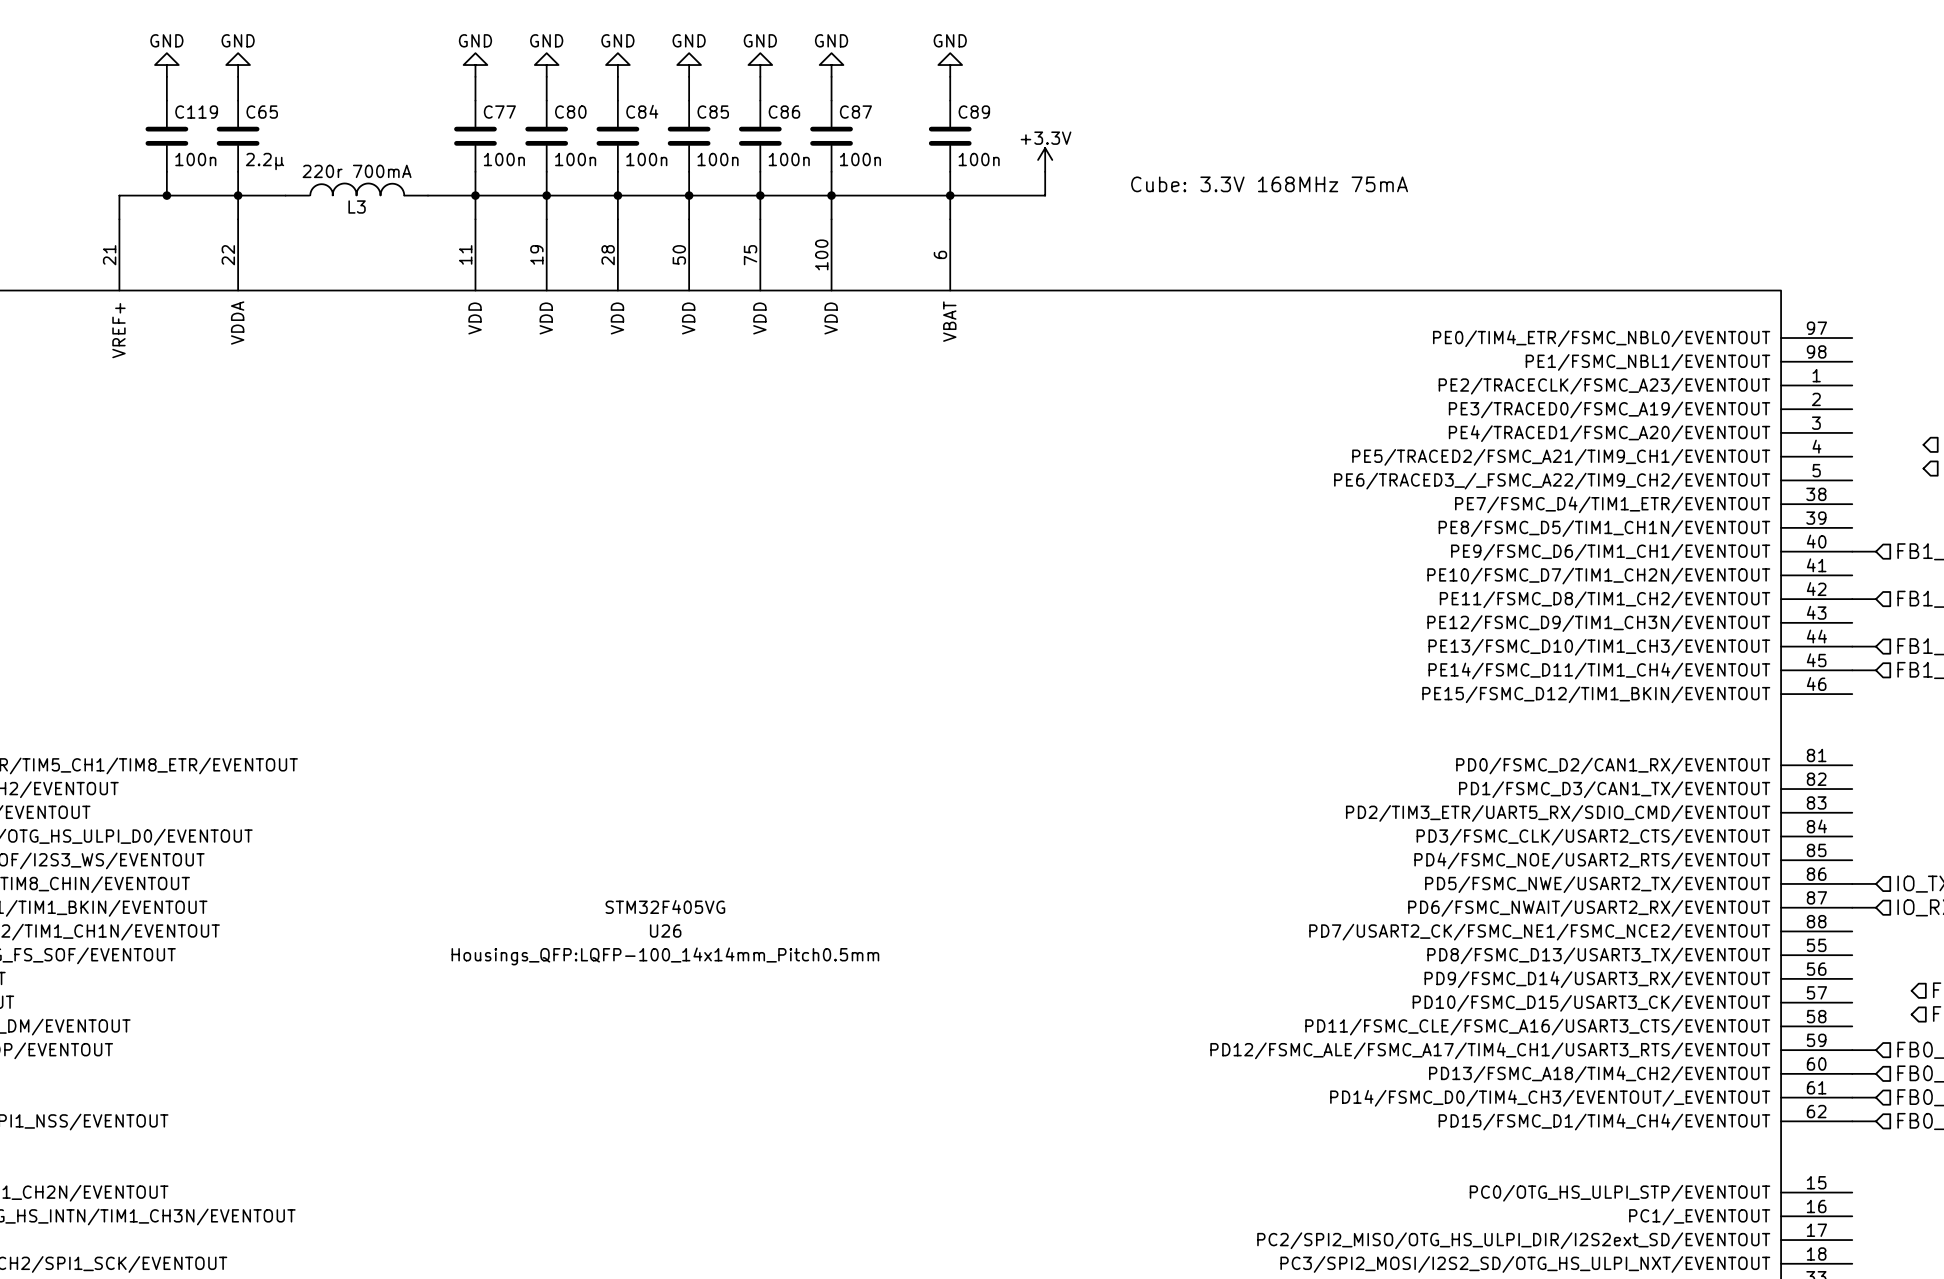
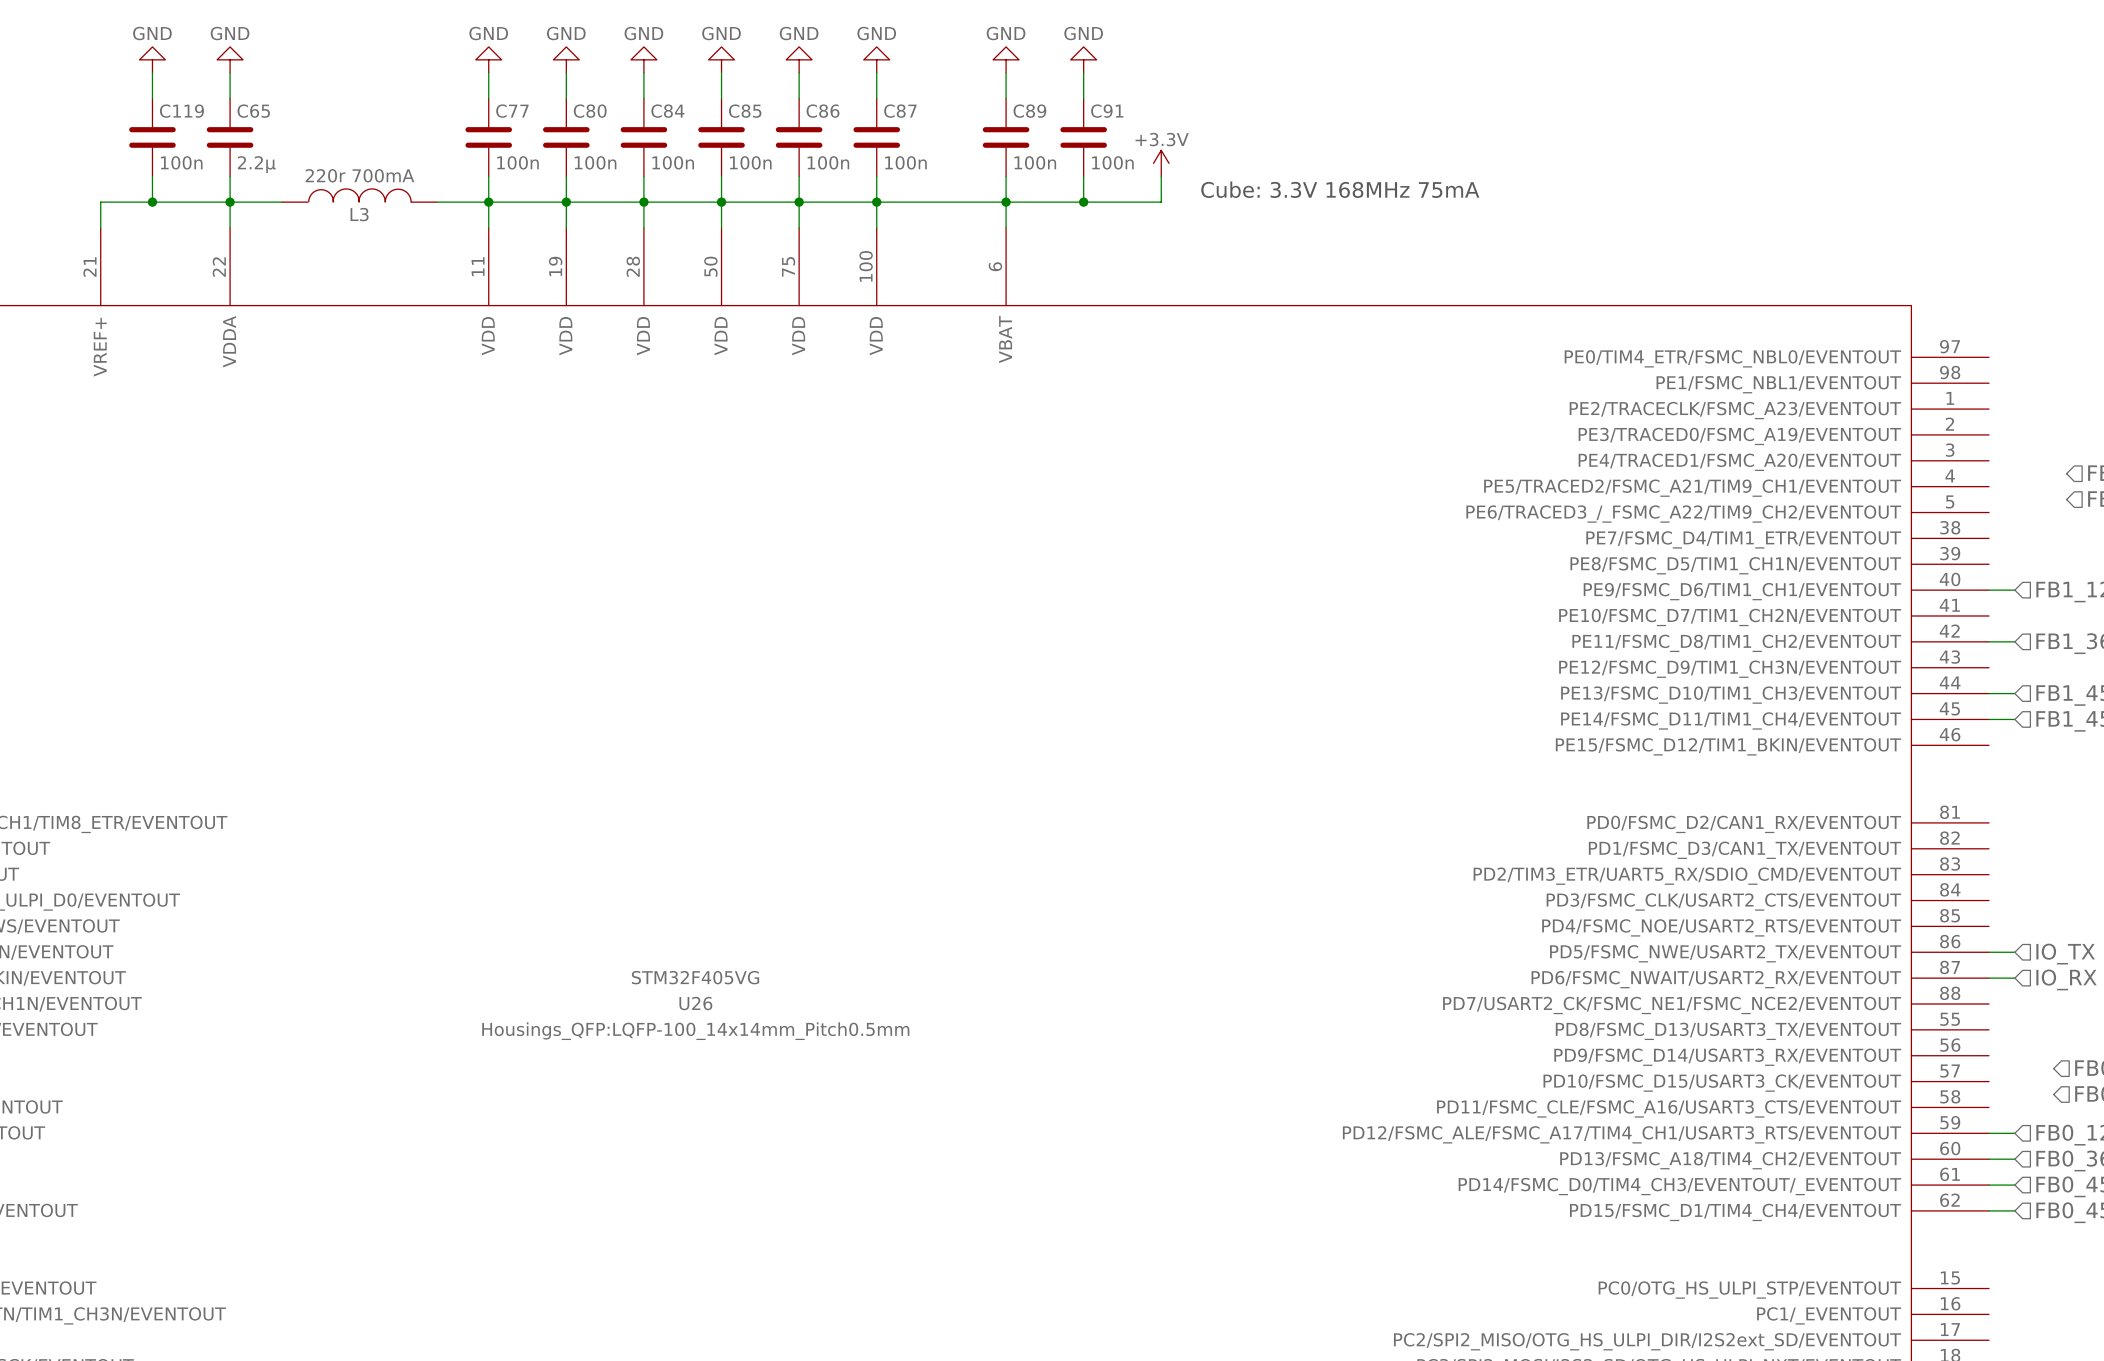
power symbol: none -> GND (1083, 59)
wire: none -> (1083, 72) (1083, 98)
C91: none -> 100n (1083, 137)
power symbol position: +3.3V (1045, 159) -> +3.3V (1161, 163)
wire: none -> (1083, 176) (1083, 202)
wire: (1045, 171) (1045, 195) -> (1161, 176) (1161, 202) (1109, 202)
junction: none -> (1083, 202)

